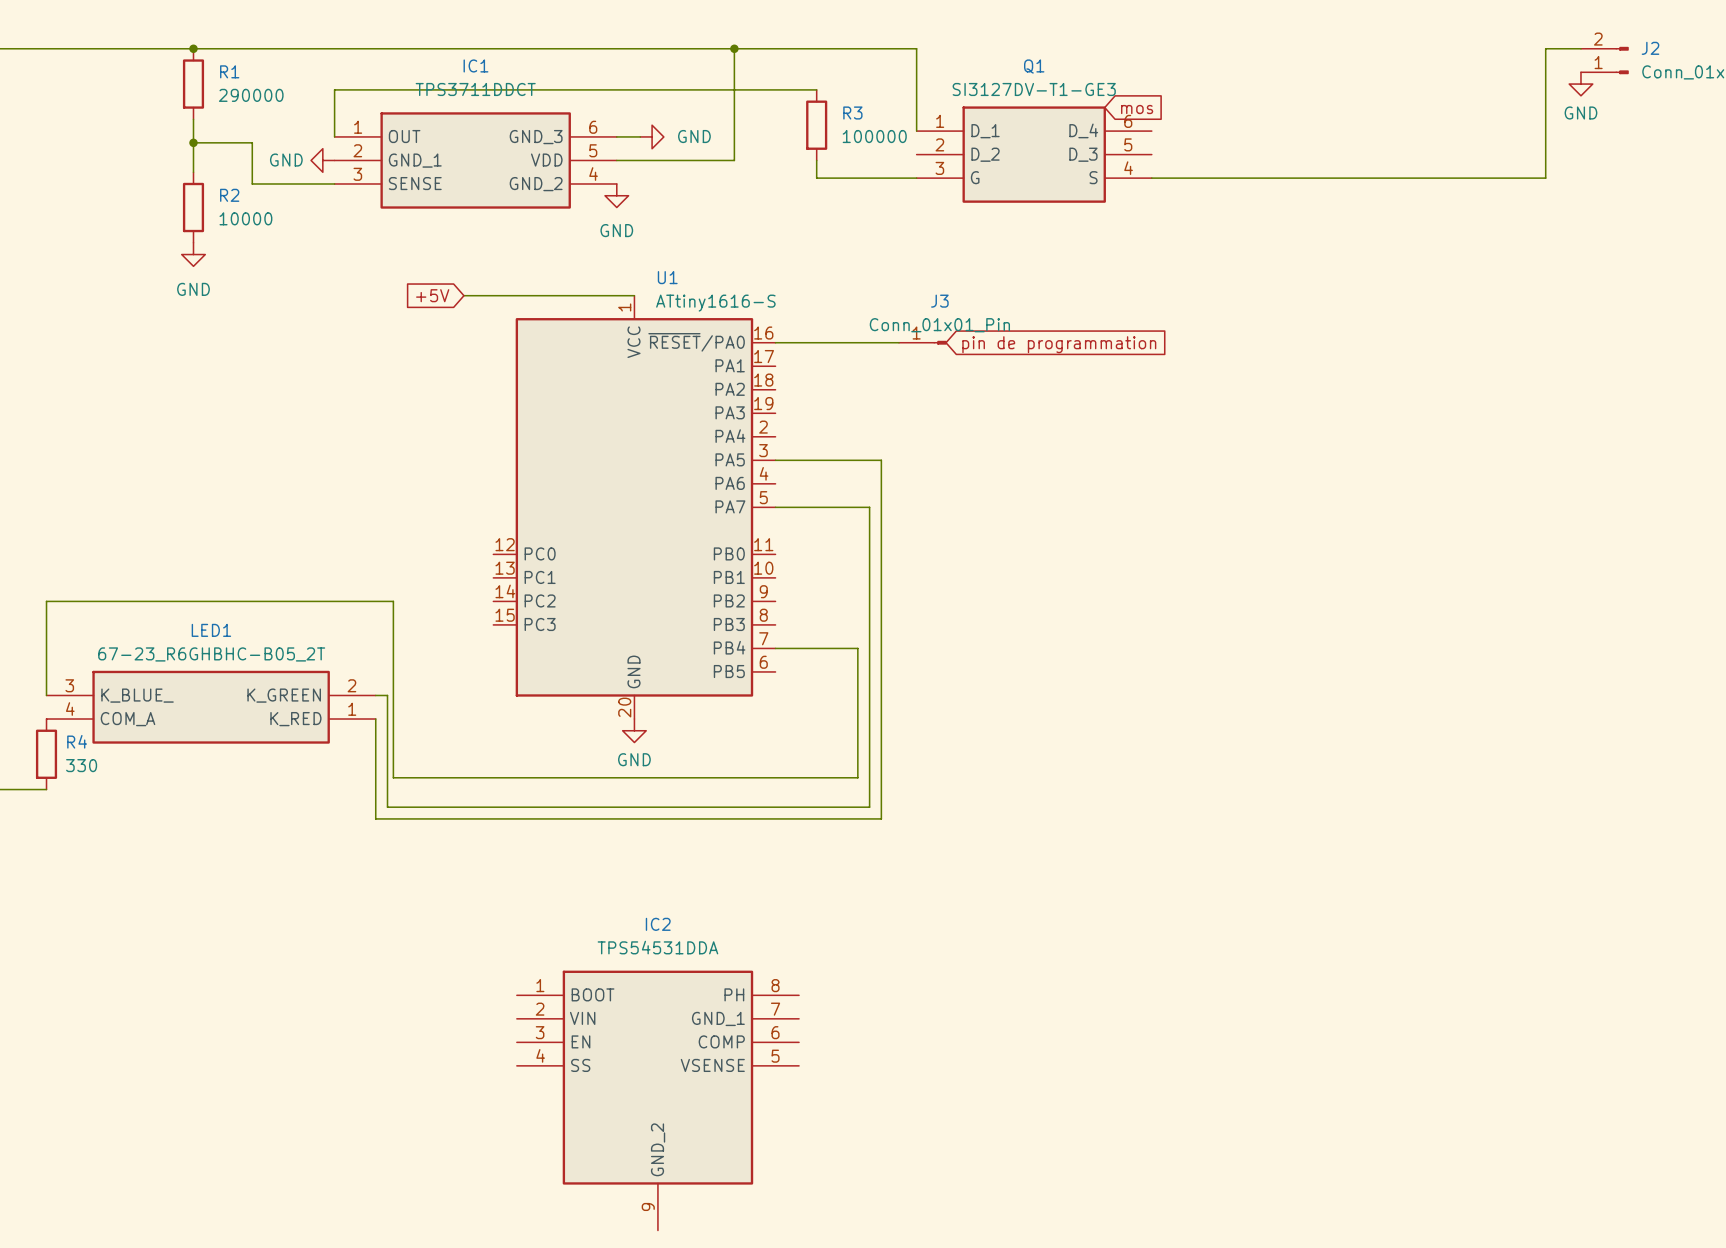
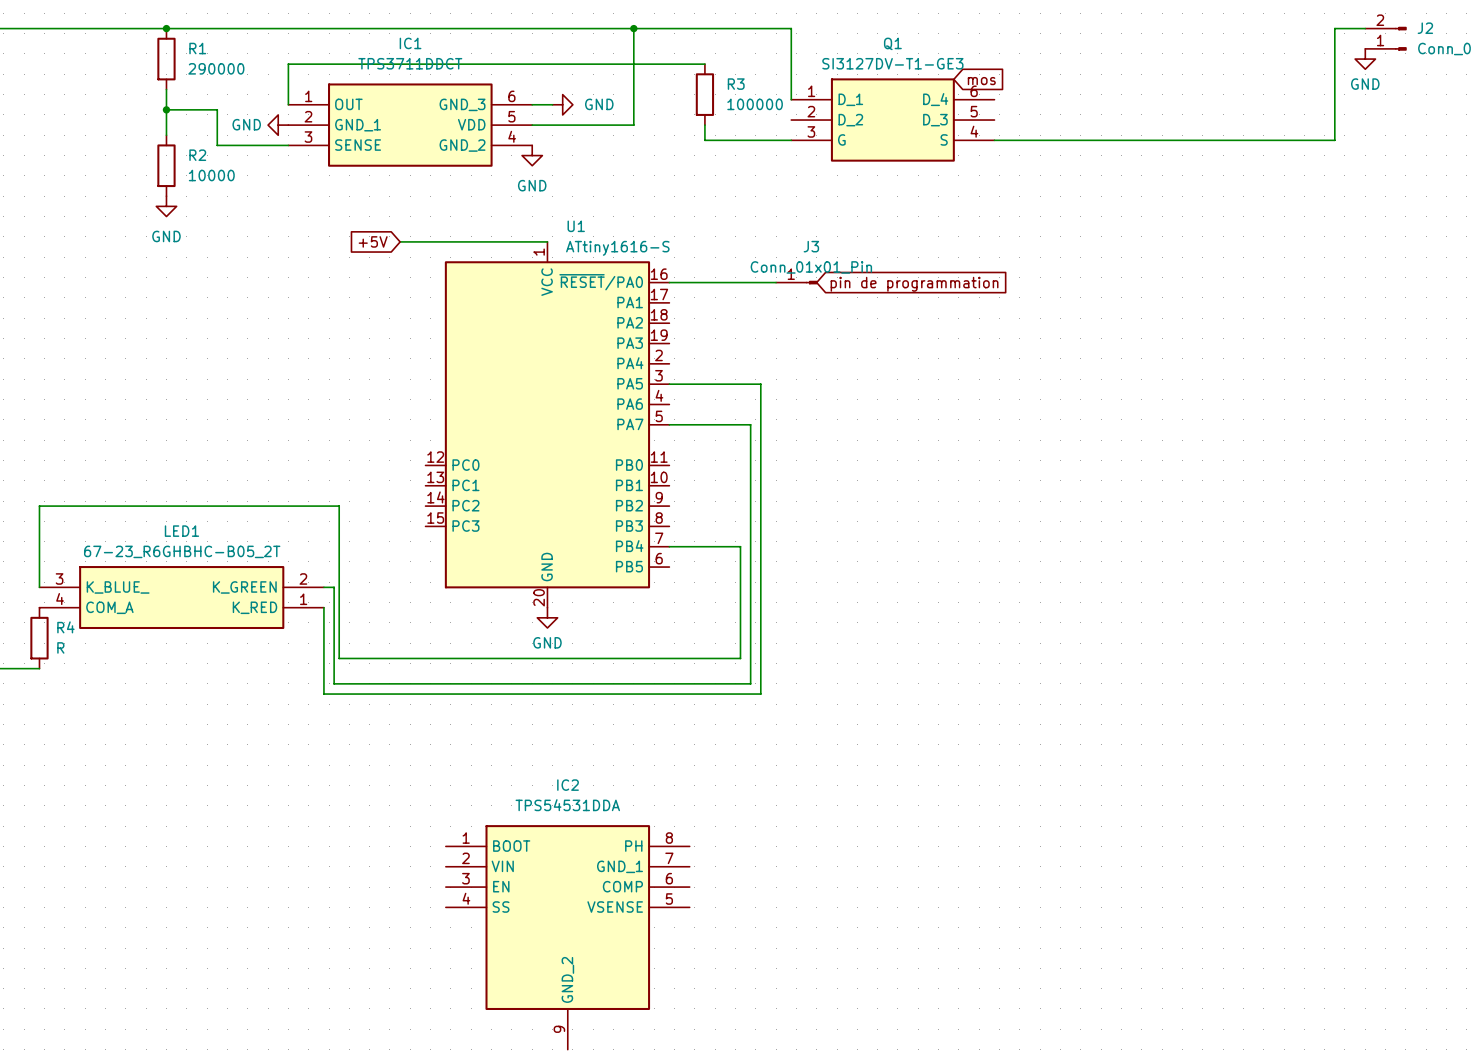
R4 value: 330 (81, 765) -> R (60, 647)

